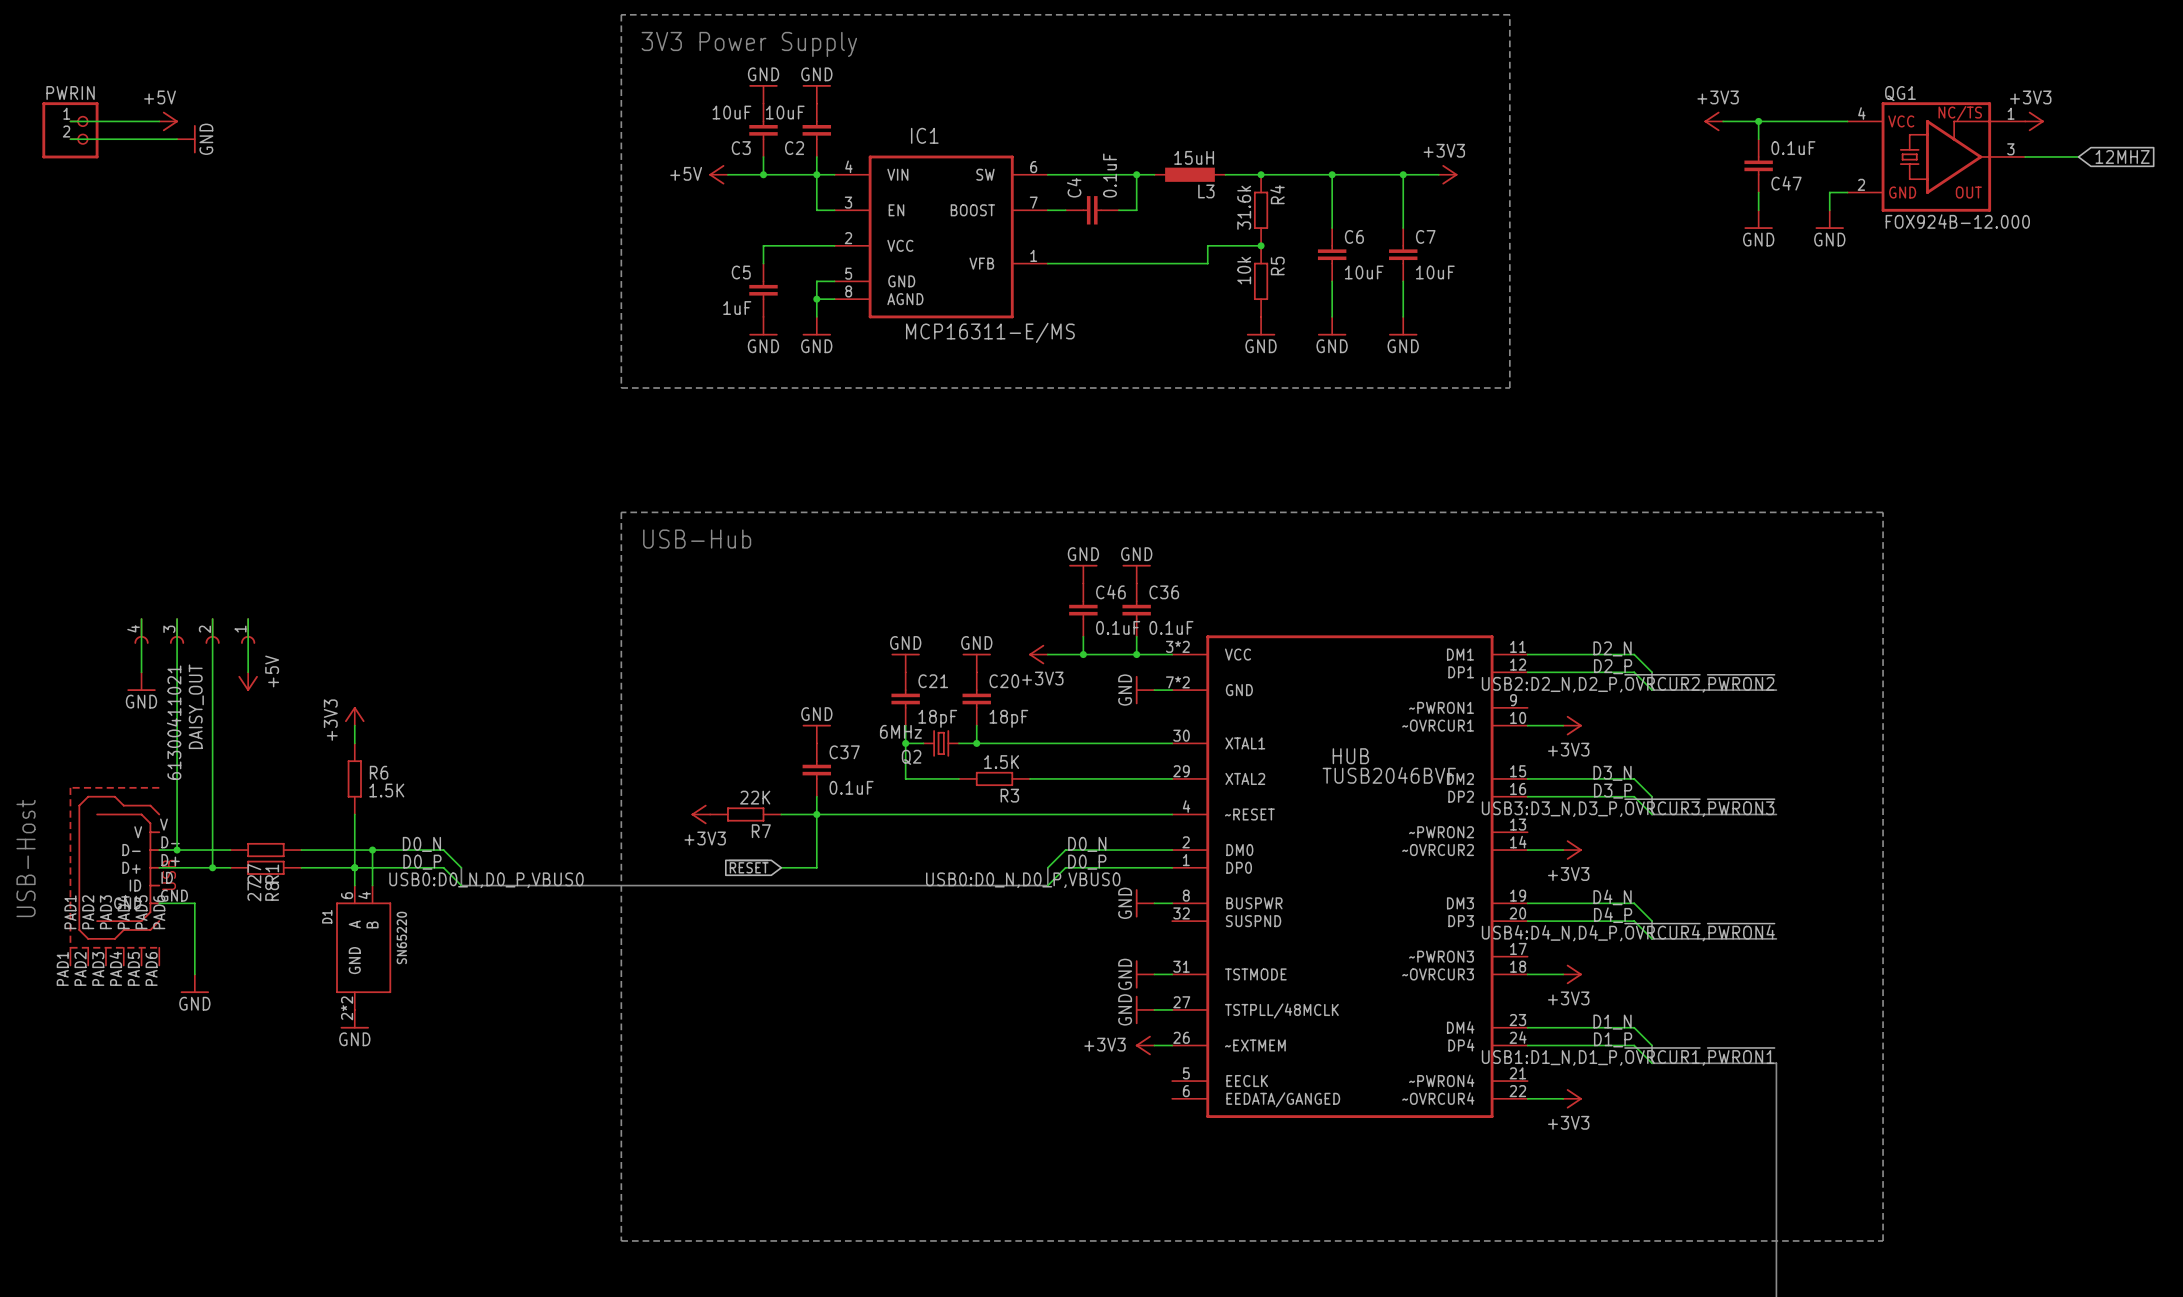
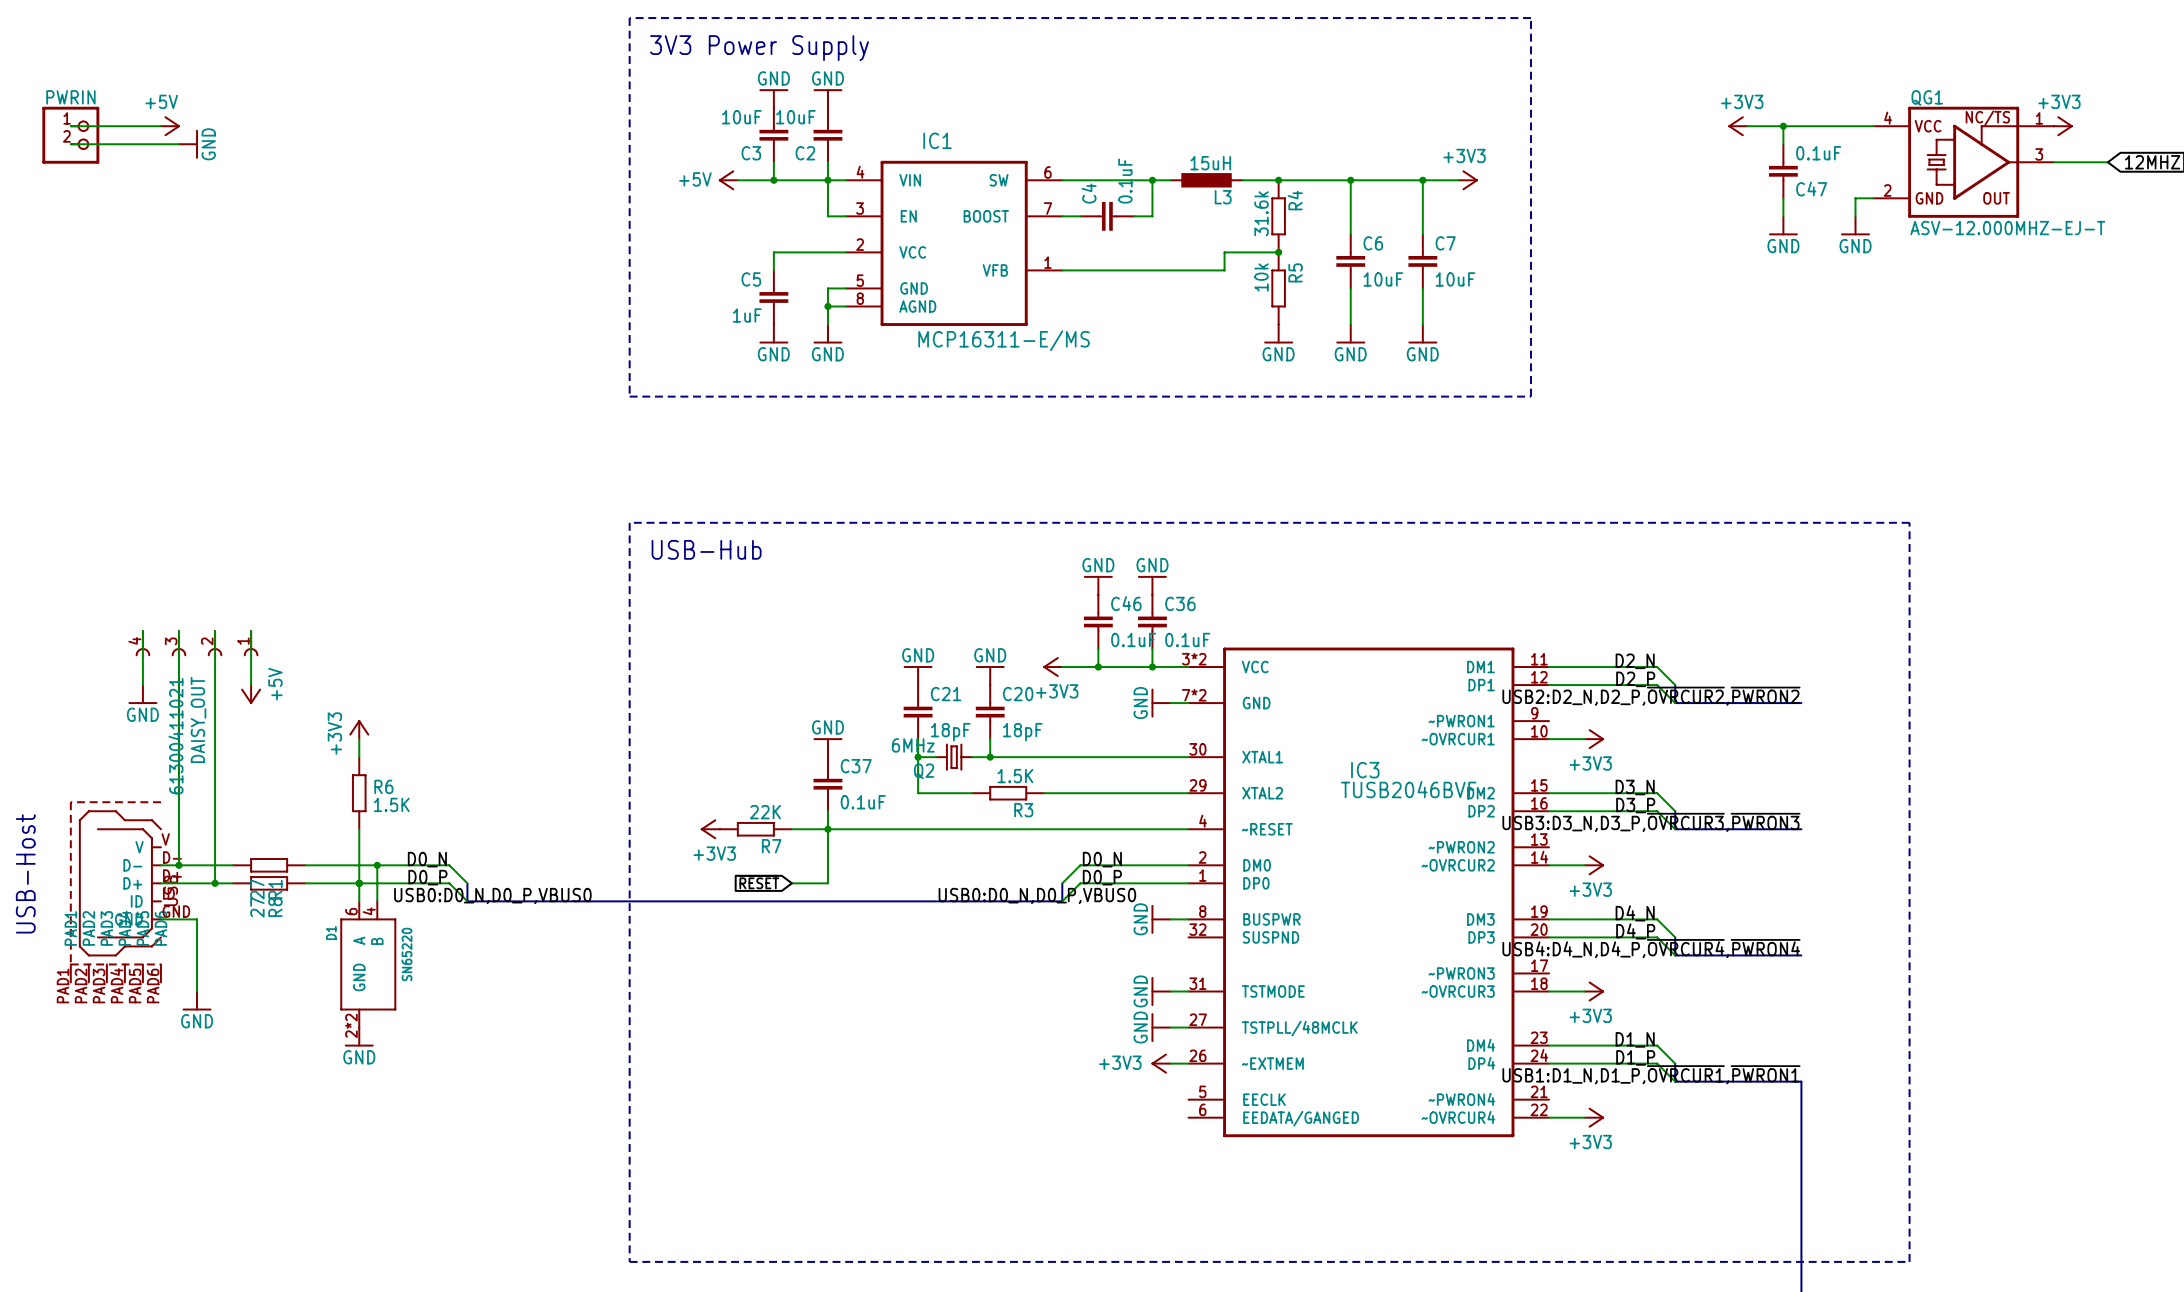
QG1 value: FOX924B-12.000 (1957, 221) -> ASV-12.000MHZ-EJ-T (2007, 228)
HUB name: HUB (1350, 756) -> IC3 (1365, 770)

